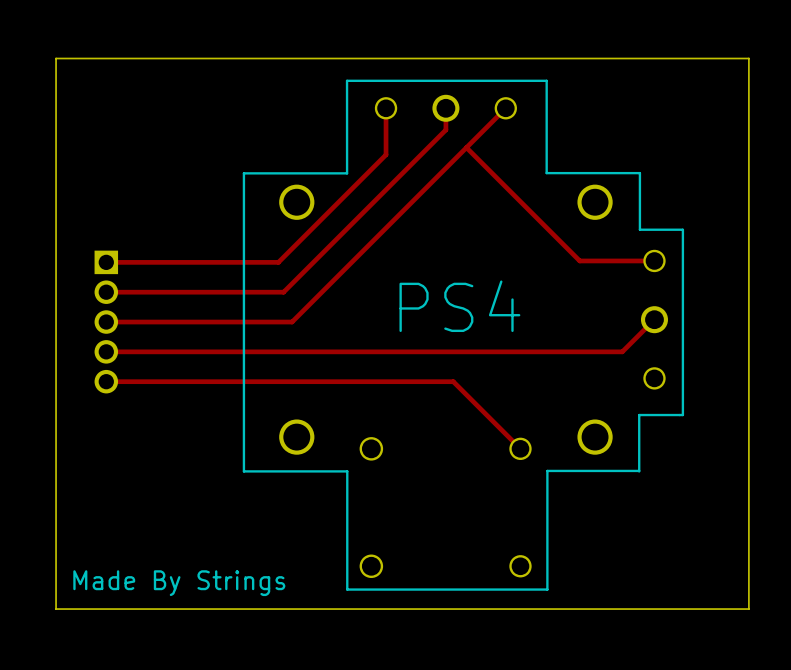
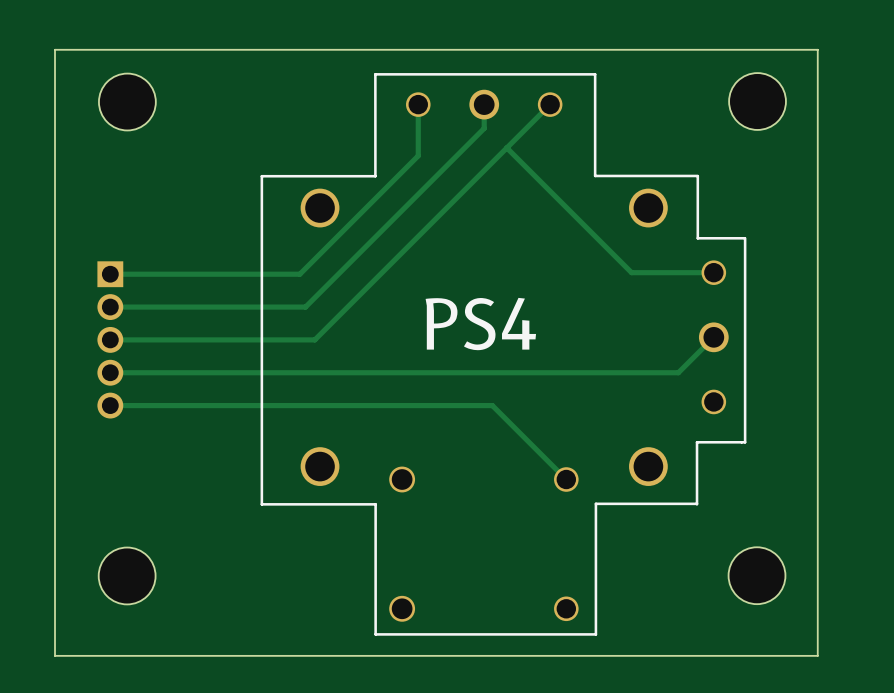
part: none -> (127, 102)
part: none -> (757, 101)
part: none -> (127, 575)
part: none -> (757, 575)
text: Made By Strings (179, 583) -> none

